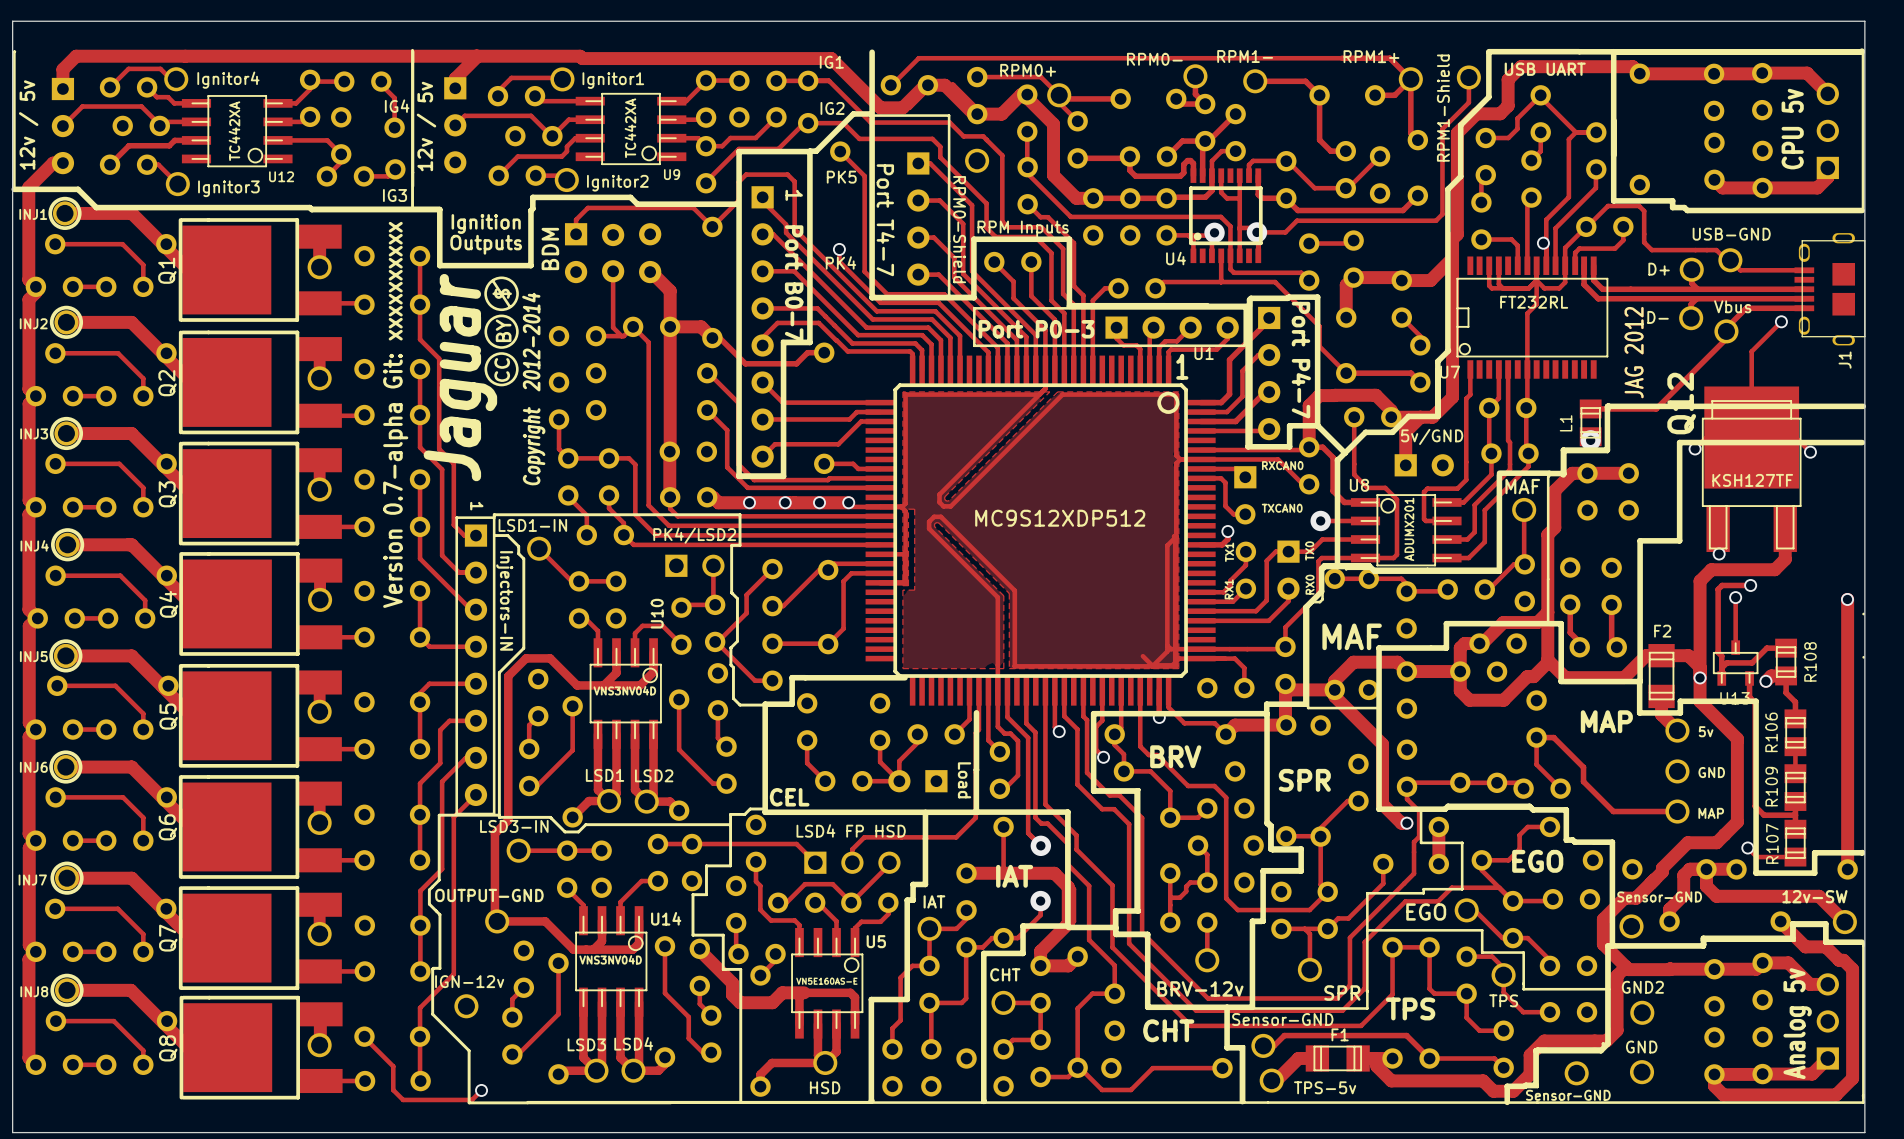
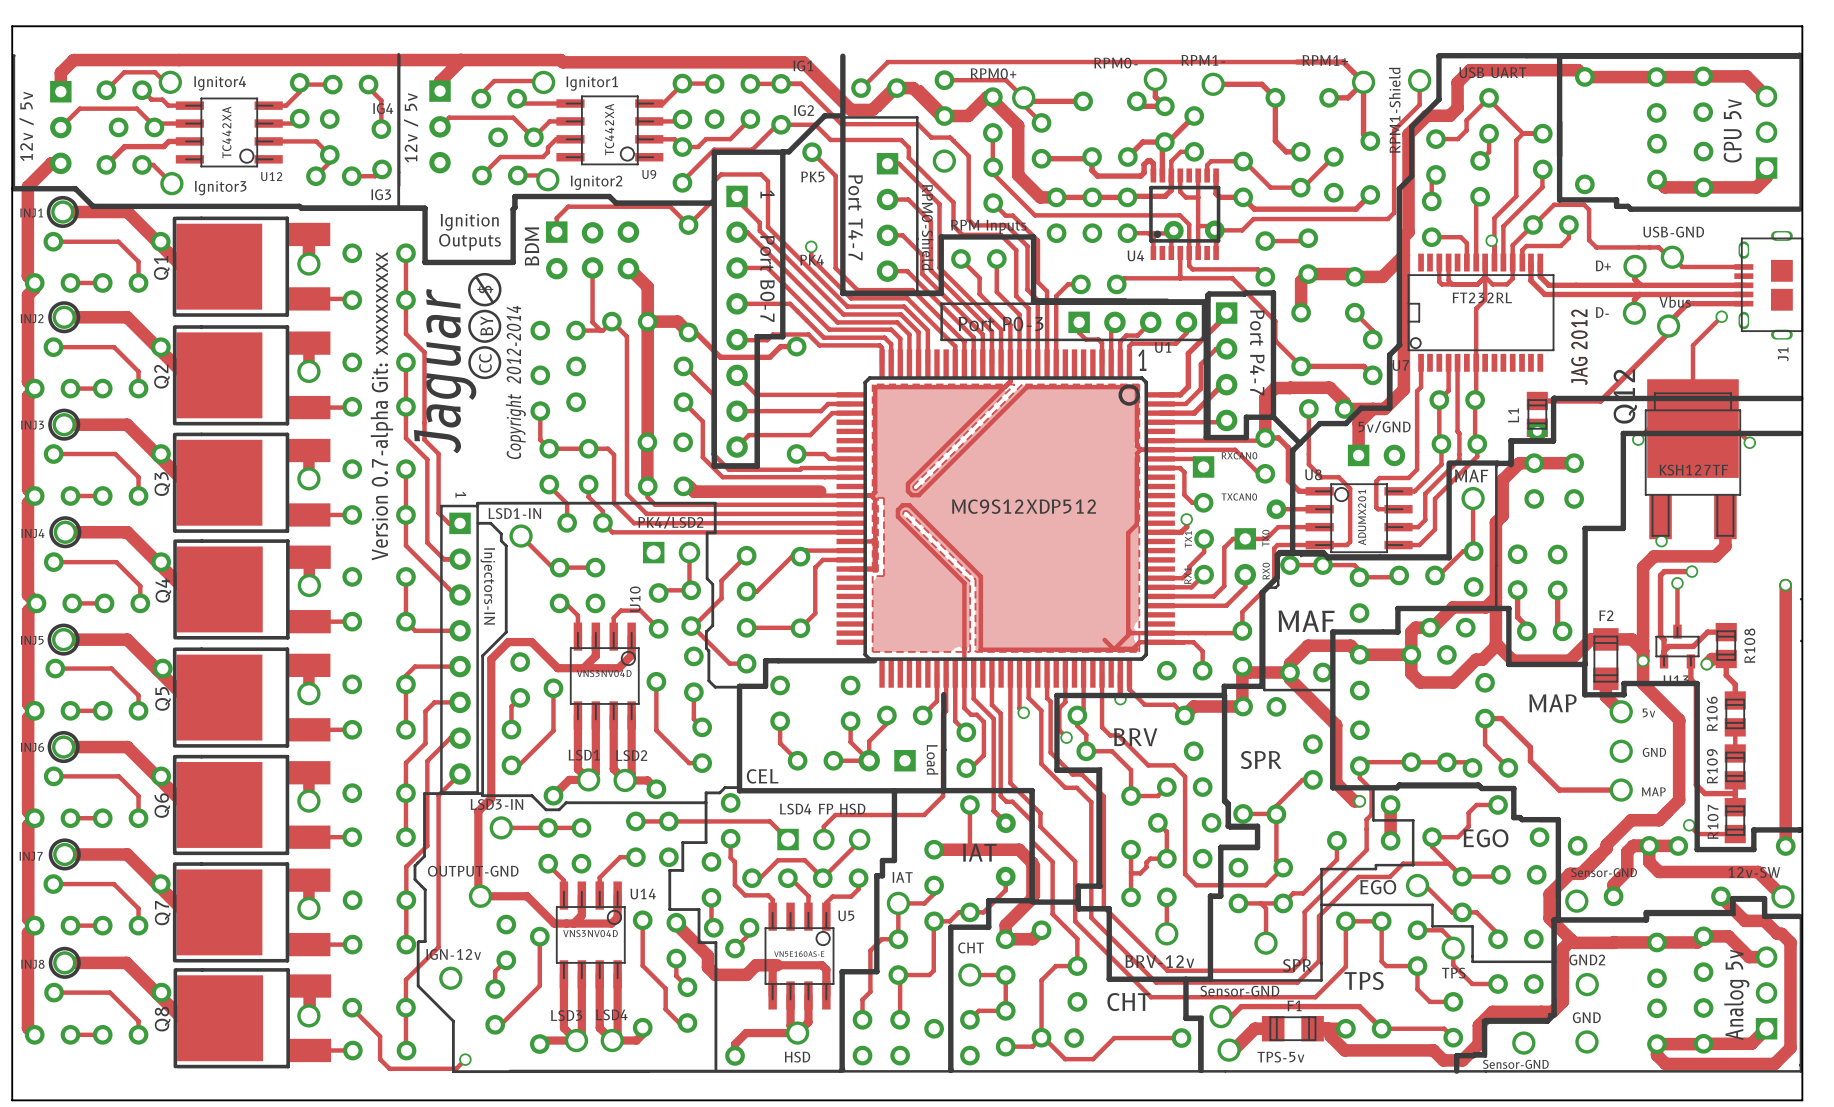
track: (836, 340) (818, 322) (777, 322) (762, 337) (762, 345) -> (808, 334) (772, 334) (767, 340) (737, 339)
via: (749, 502) -> none
via: (785, 502) -> none
via: (819, 502) -> none
via: (848, 502) -> none
track: (1176, 536) (1174, 536) (1175, 665) -> none

